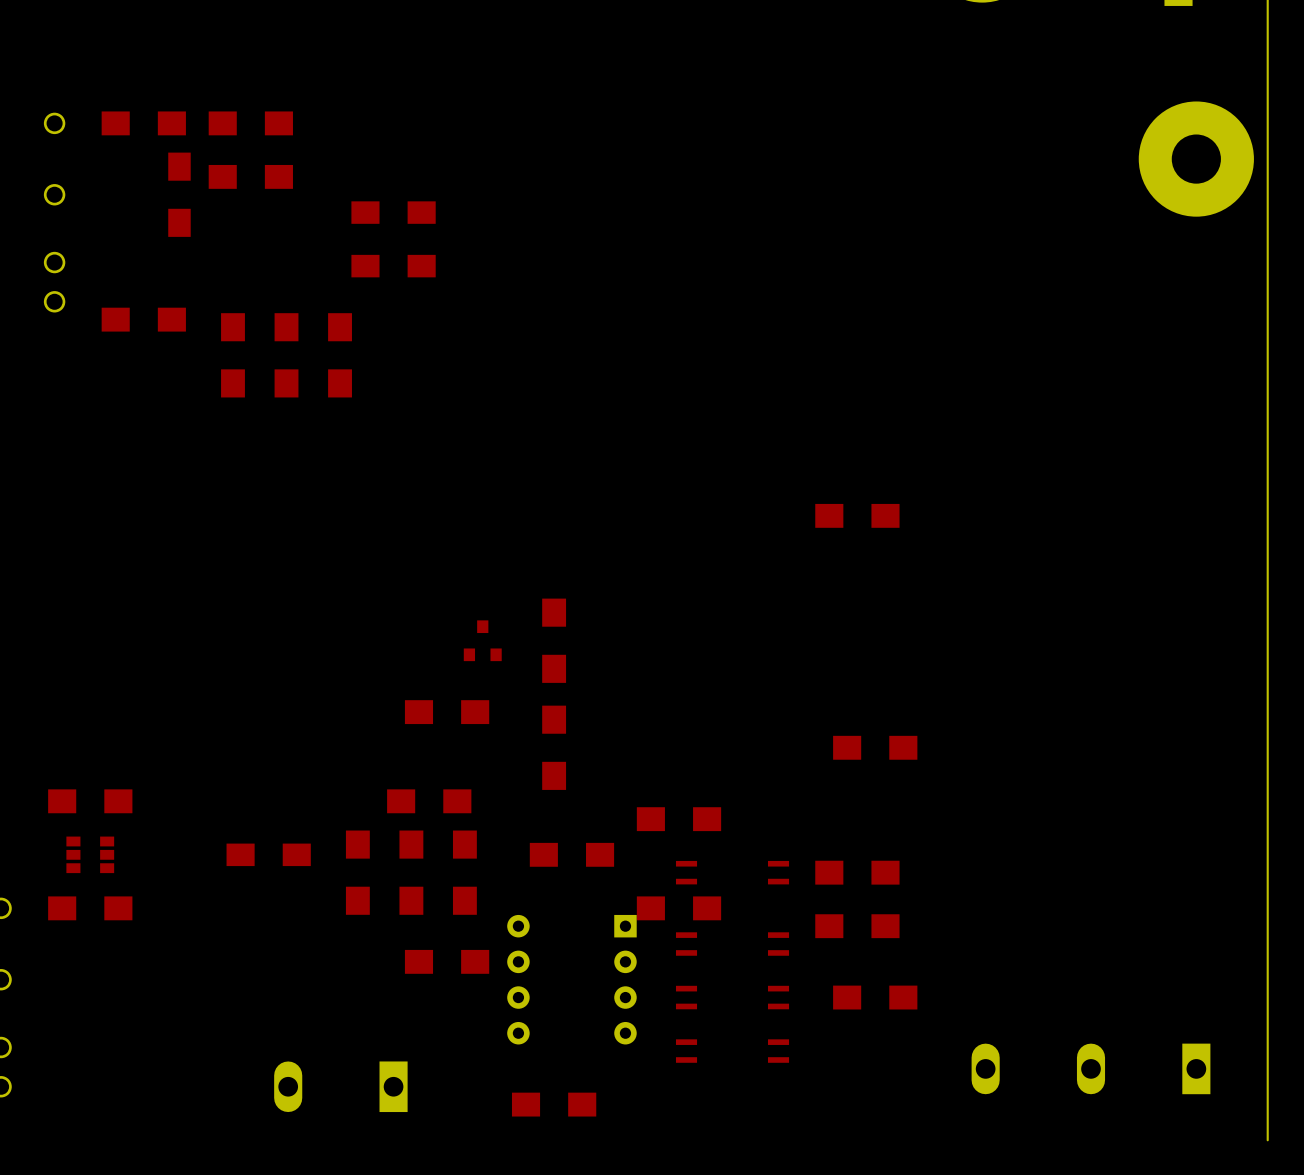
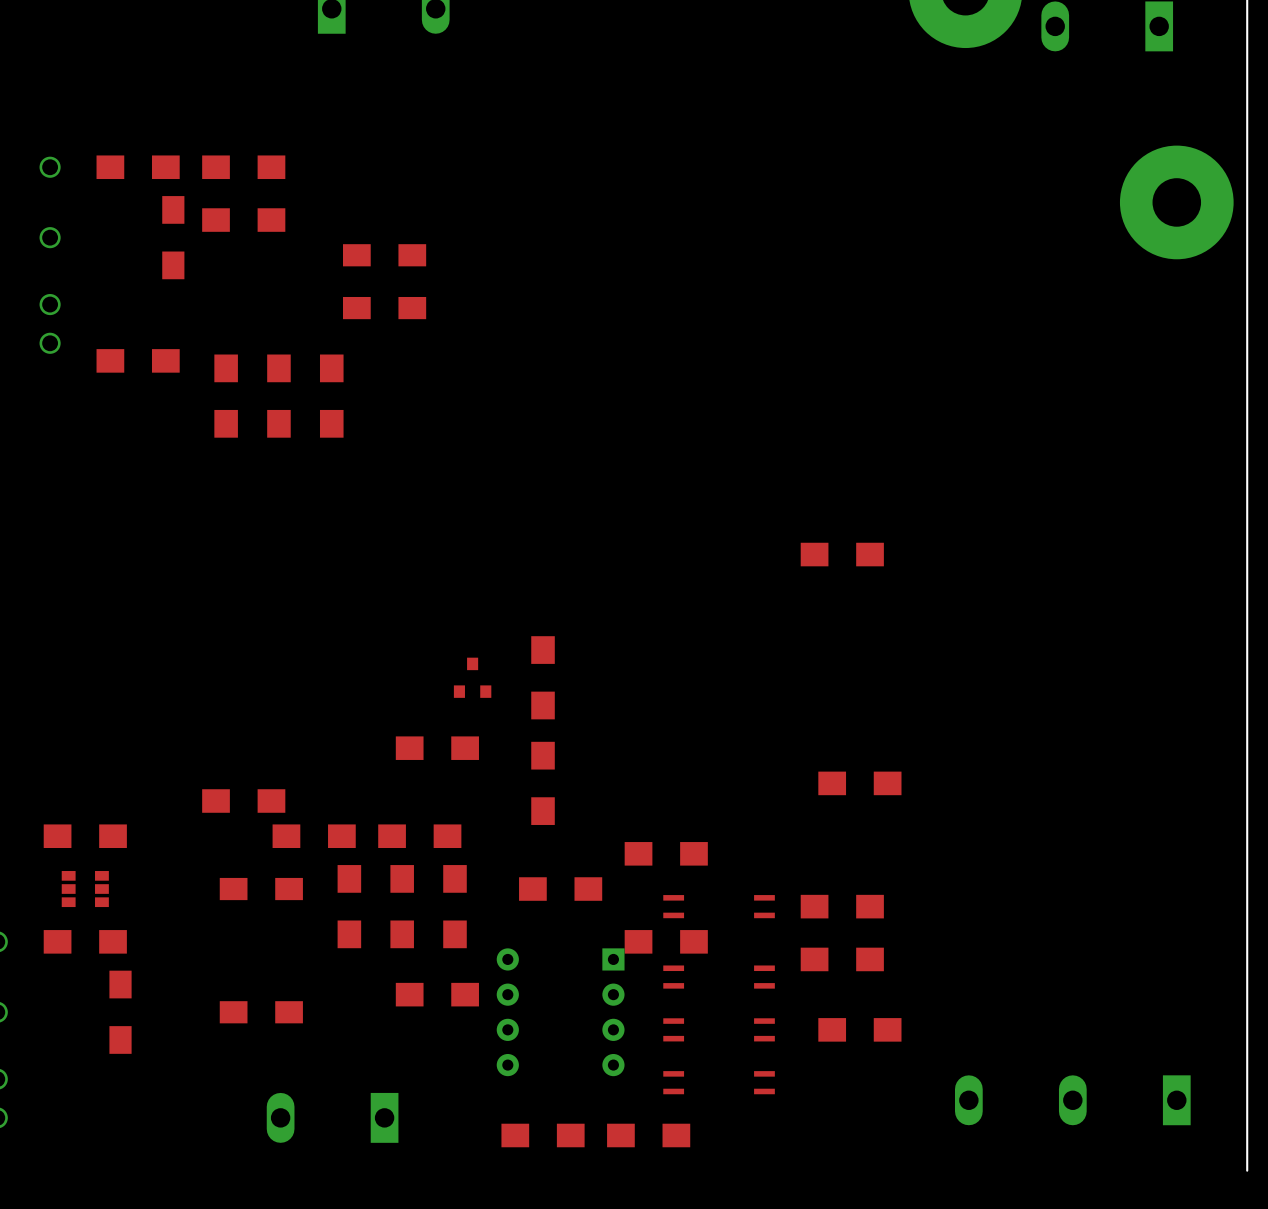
part: none -> (243, 801)
part: none -> (314, 836)
part: none -> (120, 1012)
part: none -> (261, 1012)
part: none -> (648, 1135)

